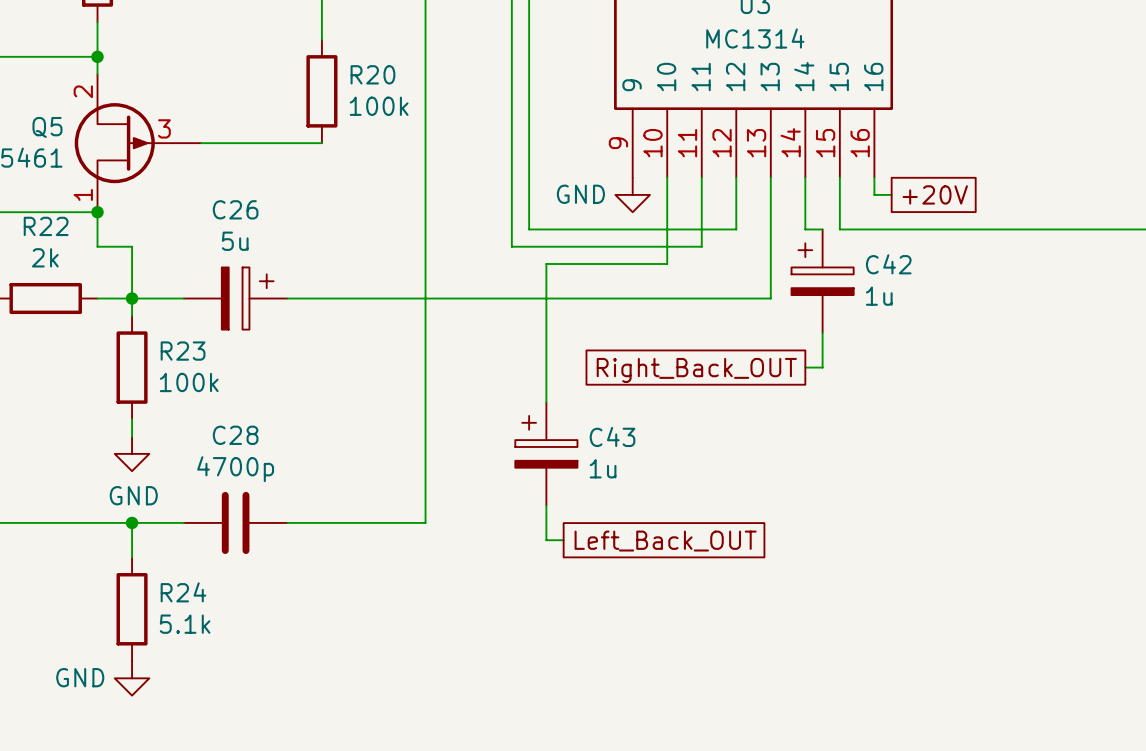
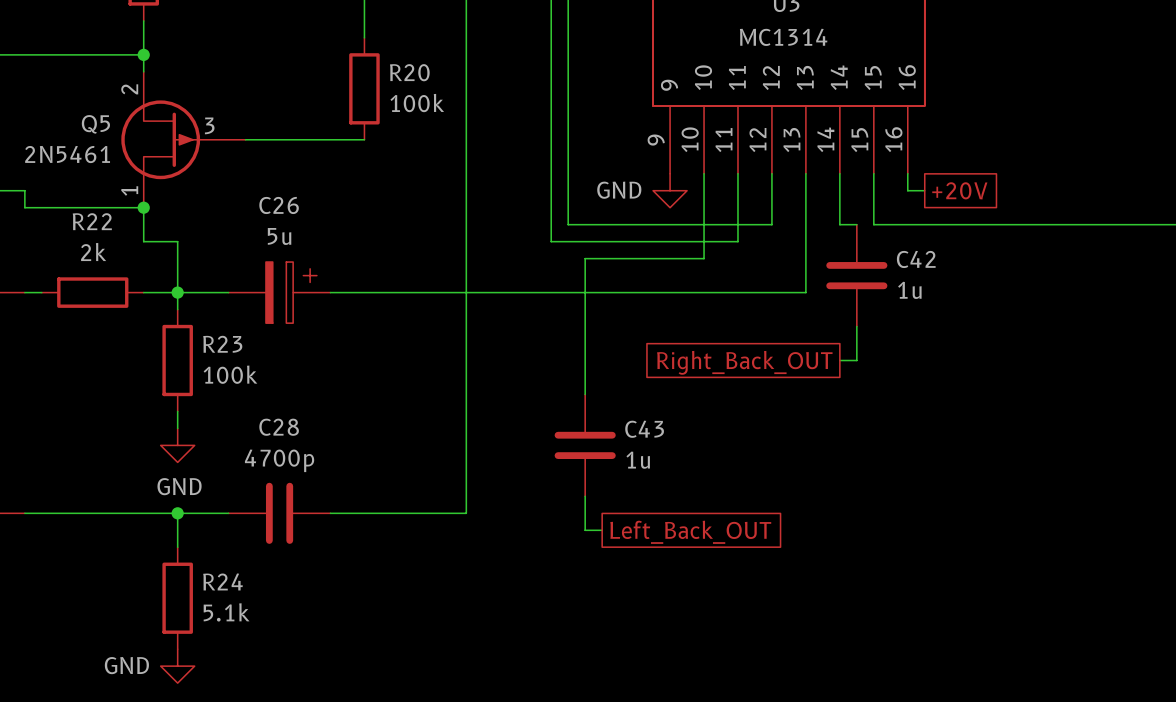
C42 symbol: [791, 229, 854, 334] -> [826, 224, 888, 327]
C43 symbol: [515, 402, 578, 506] -> [554, 394, 616, 497]

